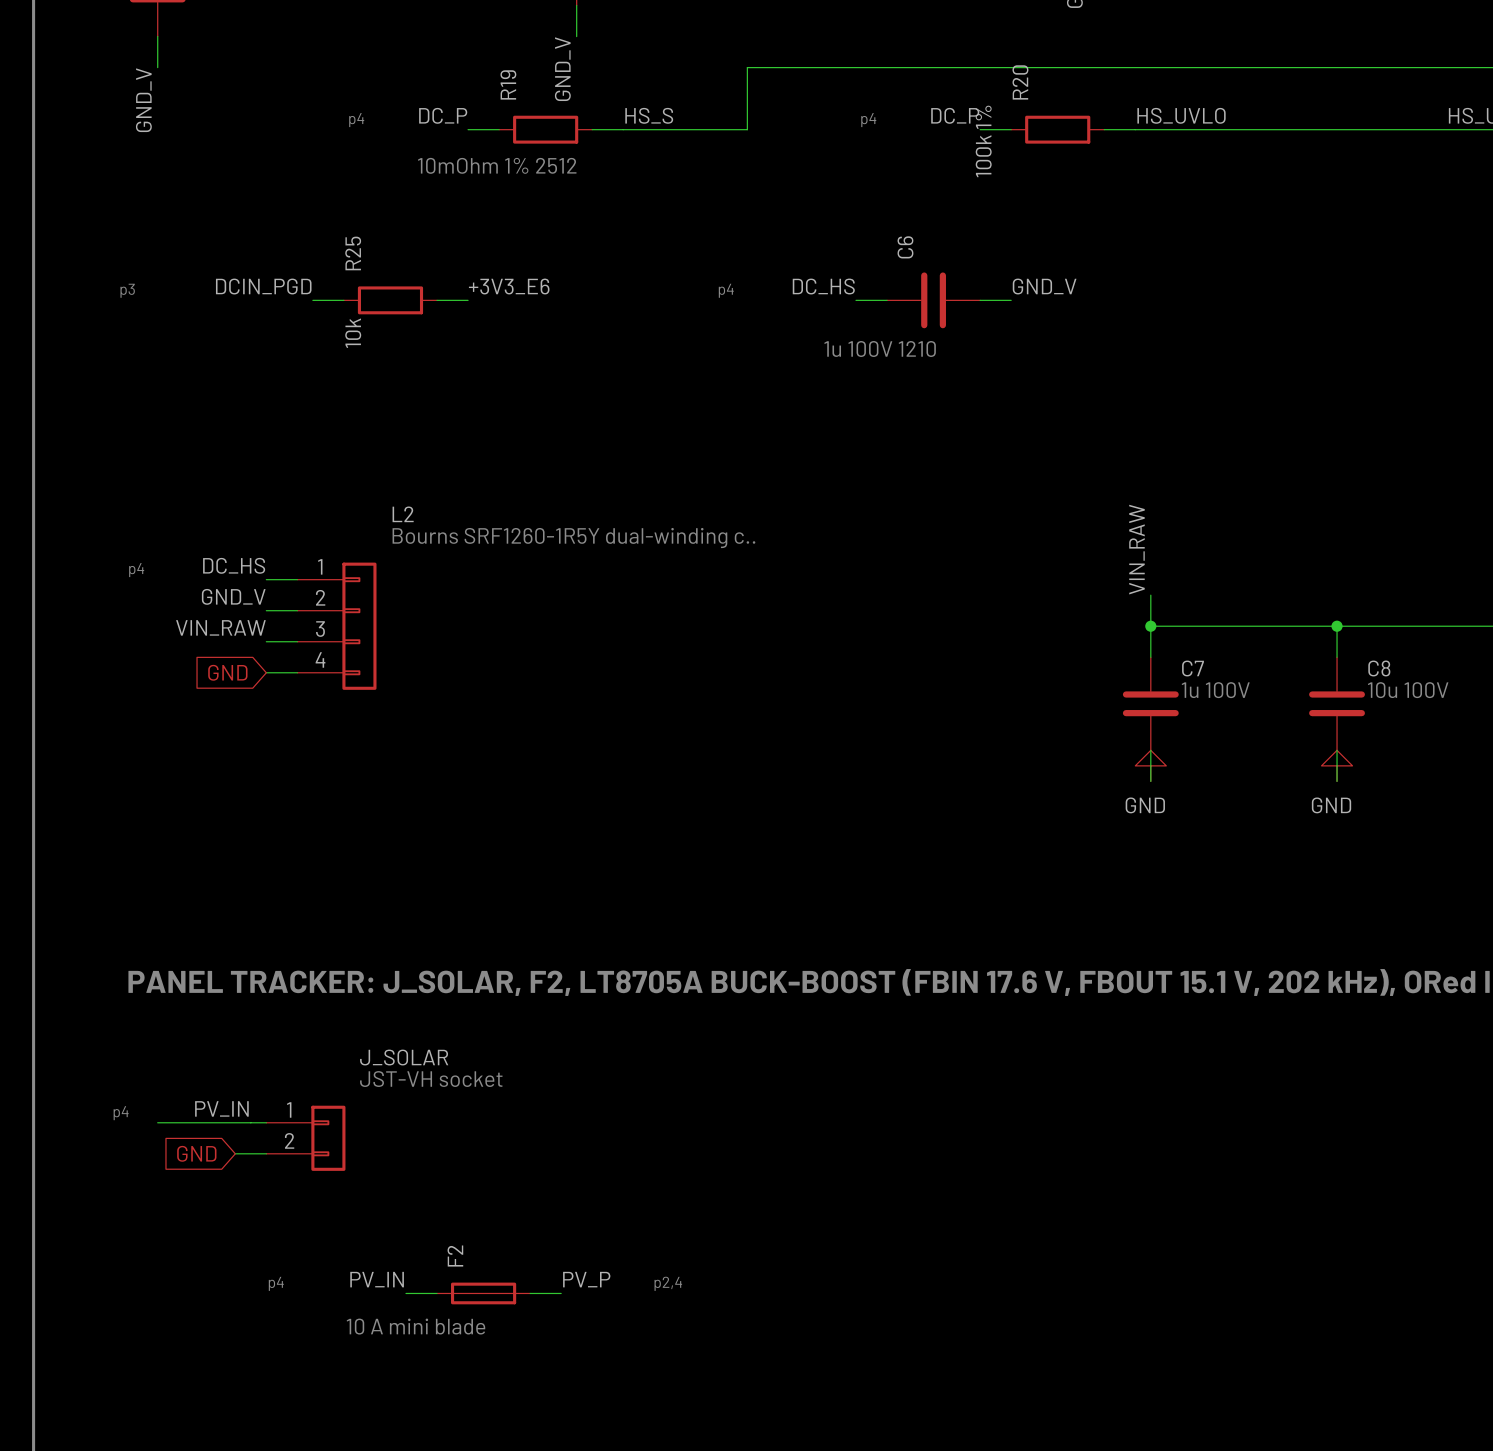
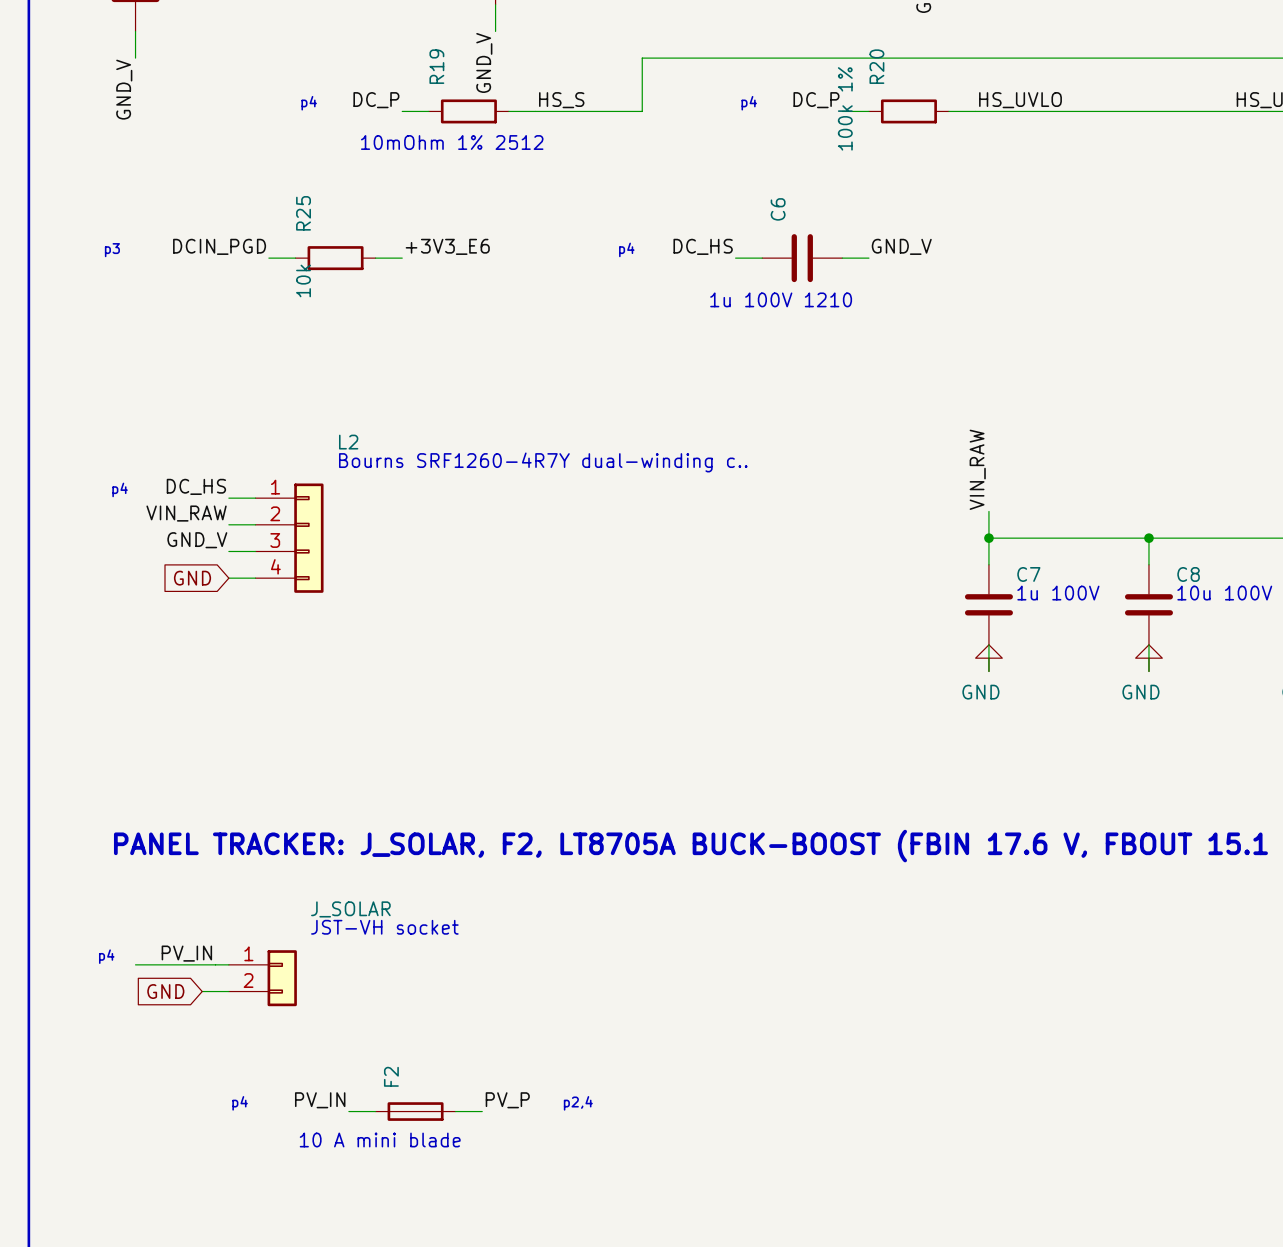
text: Bourns SRF1260-1R5Y dual-winding c.. (573, 538) -> Bourns SRF1260-4R7Y dual-winding c.. (543, 462)
label: GND_V (233, 596) -> VIN_RAW (186, 513)
label: VIN_RAW (220, 627) -> GND_V (197, 540)

